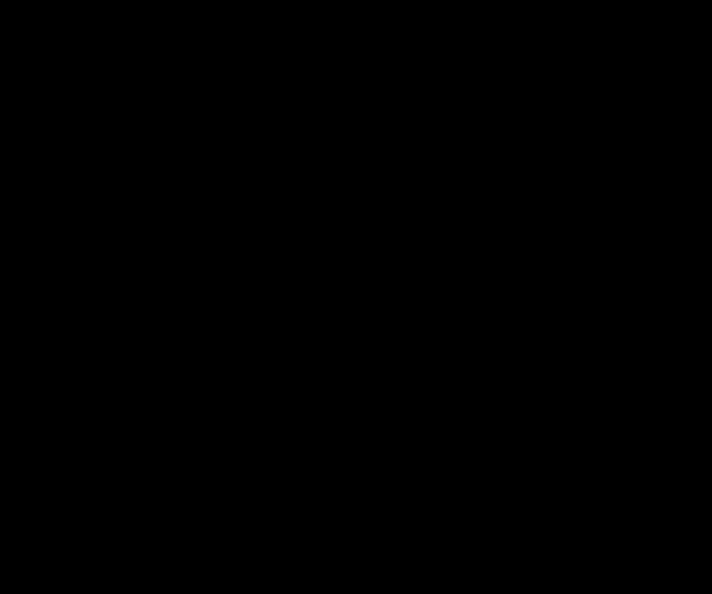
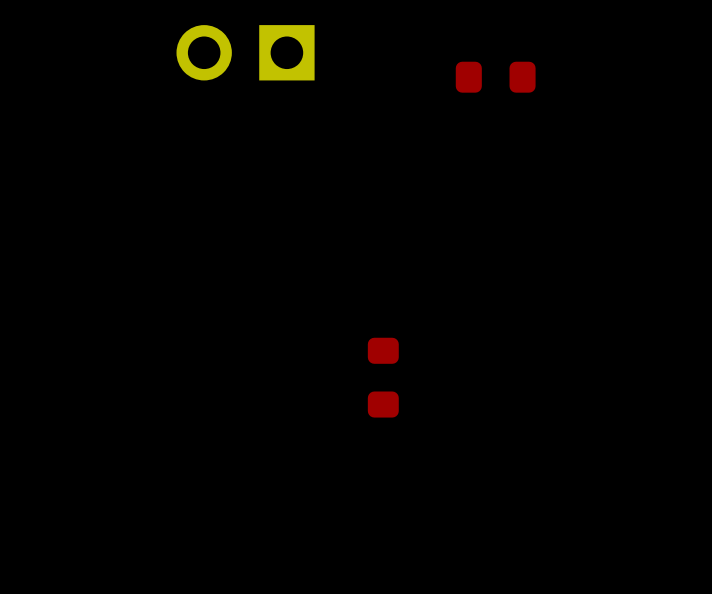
part: none -> (245, 52)
part: none -> (495, 77)
part: none -> (383, 377)

